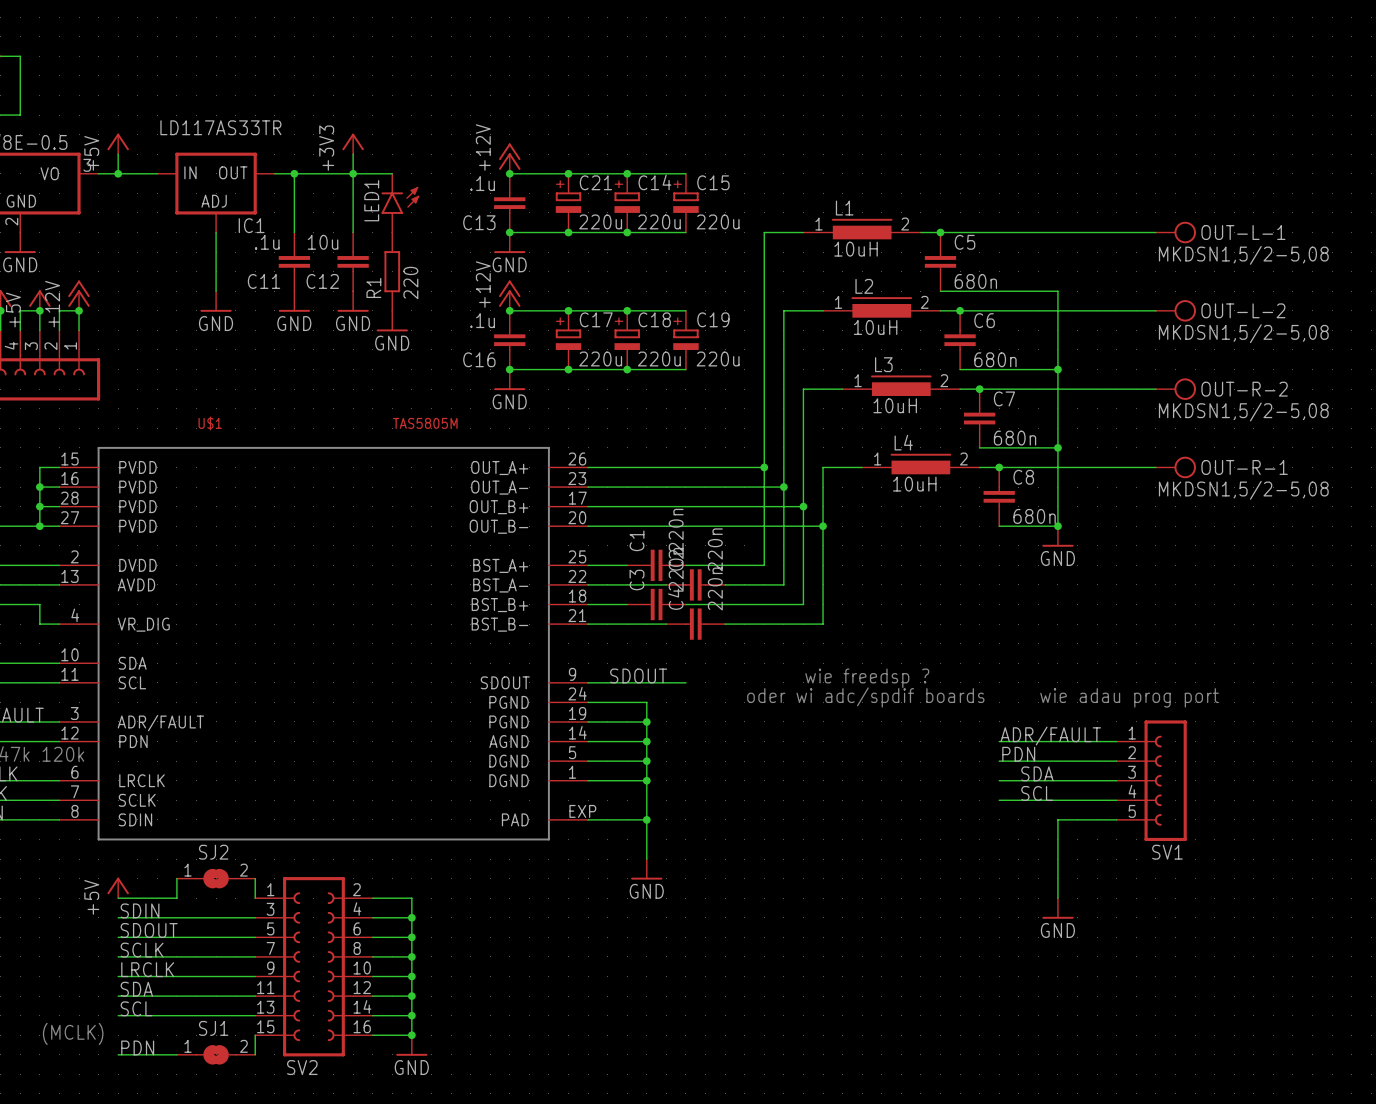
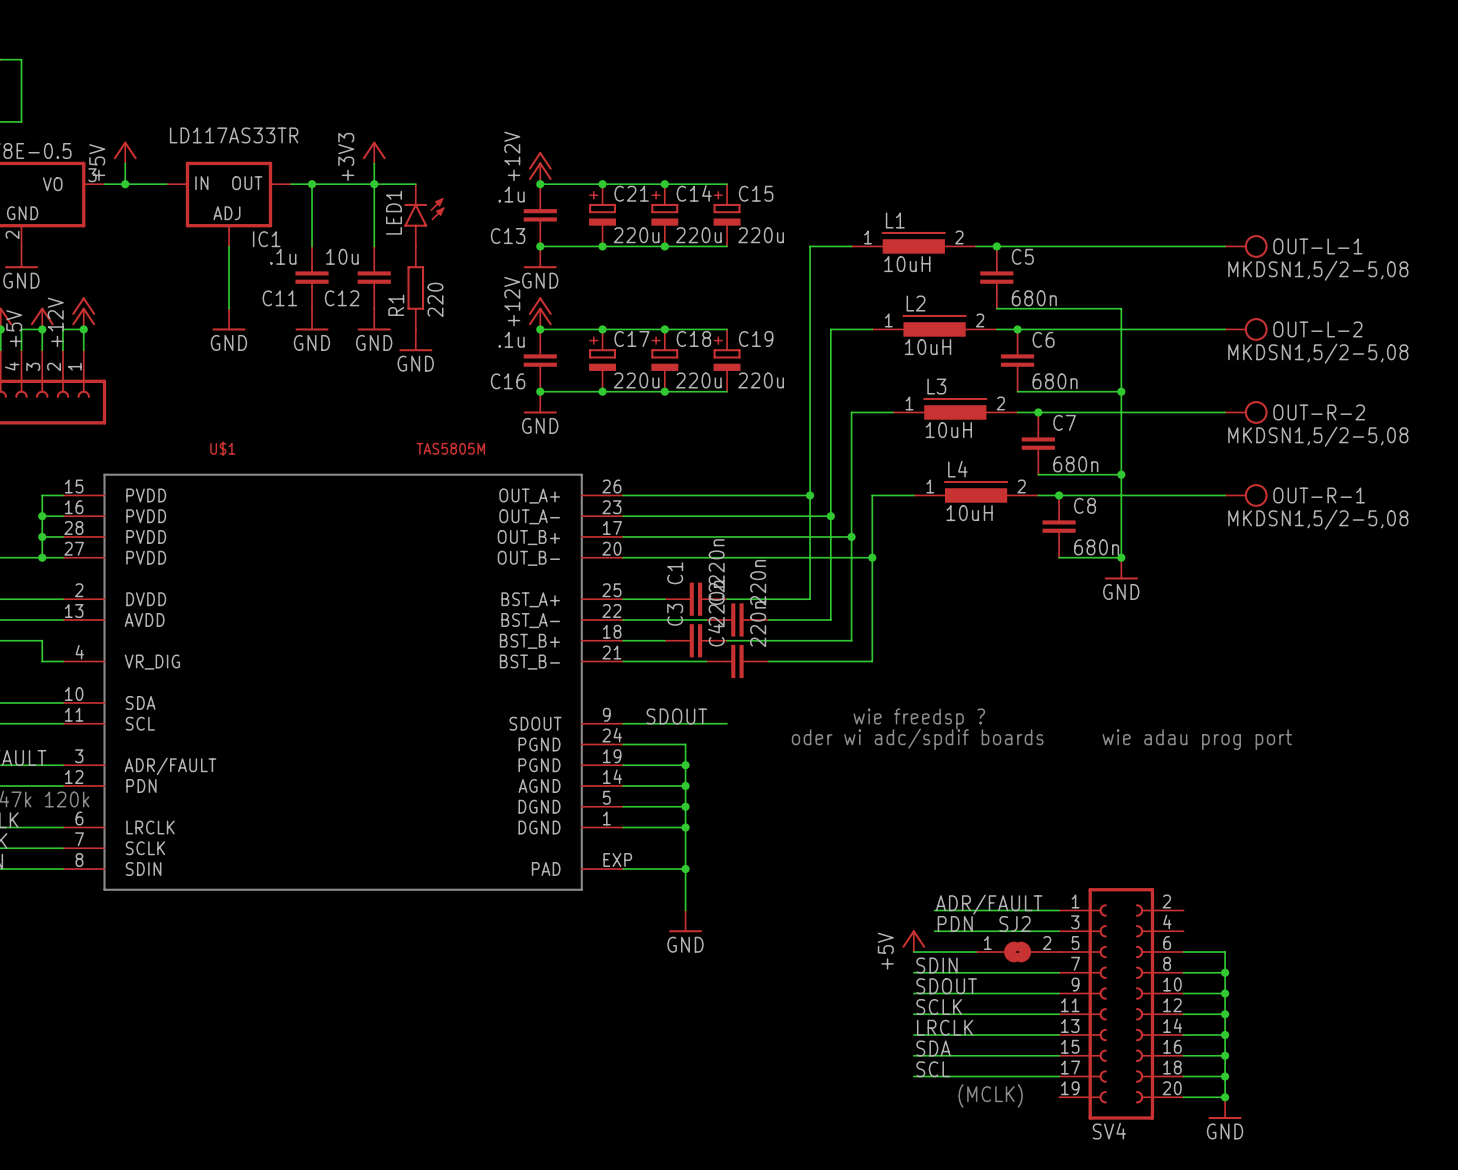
label position: ADR/FAULT (1050, 736) -> ADR/FAULT (989, 904)
wire: (999, 741) (1116, 741) -> none
label position: PDN (1018, 754) -> PDN (955, 923)
wire: (999, 761) (1116, 761) -> none
label: SDA (1037, 773) -> none
wire: (999, 780) (1116, 780) -> (934, 910) (1059, 910)
SV1: (1151, 780) -> none
label: SCL (1037, 793) -> none
wire: (999, 800) (1116, 800) -> (934, 931) (1059, 931)
wire: (1116, 819) (1057, 819) (1057, 898) -> none
wire: (176, 878) (176, 898) (118, 898) -> none
SJ2 position: (216, 878) -> (1017, 952)
wire: (255, 878) (255, 898) -> none
power symbol: +5V (118, 887) -> none
power symbol: none -> +5V (913, 941)
wire: (372, 898) (411, 898) (411, 1035) (372, 1035) -> none
wire: none -> (913, 952) (976, 952)
wire: none -> (1183, 952) (1225, 952) (1225, 1097) (1183, 1097)
power symbol position: GND (1057, 908) -> GND (1225, 1108)
label: SDIN (140, 910) -> none
label: none -> SDIN (936, 965)
wire: (118, 917) (255, 917) -> none
wire: (372, 917) (411, 917) -> none
junction: (411, 917) -> none
wire: none -> (913, 972) (1059, 972)
wire: none -> (1183, 972) (1225, 972)
junction: none -> (1225, 972)
label: SDOUT (149, 930) -> none
label: none -> SDOUT (946, 986)
wire: (118, 937) (255, 937) -> none
wire: (372, 937) (411, 937) -> none
junction: (411, 937) -> none
wire: none -> (913, 993) (1059, 993)
wire: none -> (1183, 993) (1225, 993)
junction: none -> (1225, 993)
SV4: none -> (1121, 1003)
label: SCLK (142, 950) -> none
label: none -> SCLK (939, 1007)
wire: (118, 956) (255, 956) -> none
wire: (372, 956) (411, 956) -> none
junction: (411, 956) -> none
wire: none -> (913, 1014) (1059, 1014)
wire: none -> (1183, 1014) (1225, 1014)
junction: none -> (1225, 1014)
SV2: (313, 966) -> none
label: LRCLK (147, 969) -> none
label: none -> LRCLK (945, 1027)
wire: (118, 976) (255, 976) -> none
wire: (372, 976) (411, 976) -> none
junction: (411, 976) -> none
wire: none -> (913, 1035) (1059, 1035)
wire: none -> (1183, 1035) (1225, 1035)
junction: none -> (1225, 1035)
label: SDA (136, 989) -> none
label: none -> SDA (933, 1048)
wire: (118, 996) (255, 996) -> none
wire: (372, 996) (411, 996) -> none
junction: (411, 996) -> none
wire: none -> (913, 1055) (1059, 1055)
wire: none -> (1183, 1055) (1225, 1055)
junction: none -> (1225, 1055)
label: SCL (136, 1008) -> none
label: none -> SCL (933, 1069)
wire: (118, 1015) (255, 1015) -> none
wire: (372, 1015) (411, 1015) -> none
junction: (411, 1015) -> none
wire: none -> (913, 1076) (1059, 1076)
wire: none -> (1183, 1076) (1225, 1076)
junction: none -> (1225, 1076)
text: (MCLK) (73, 1033) -> none
text: none -> (MCLK) (990, 1095)
wire: (255, 1035) (255, 1054) -> none
junction: (411, 1035) -> none
junction: none -> (1225, 1097)
power symbol: GND (411, 1045) -> none
label: PDN (137, 1047) -> none
wire: (118, 1054) (176, 1054) -> none
SJ1: (216, 1054) -> none

